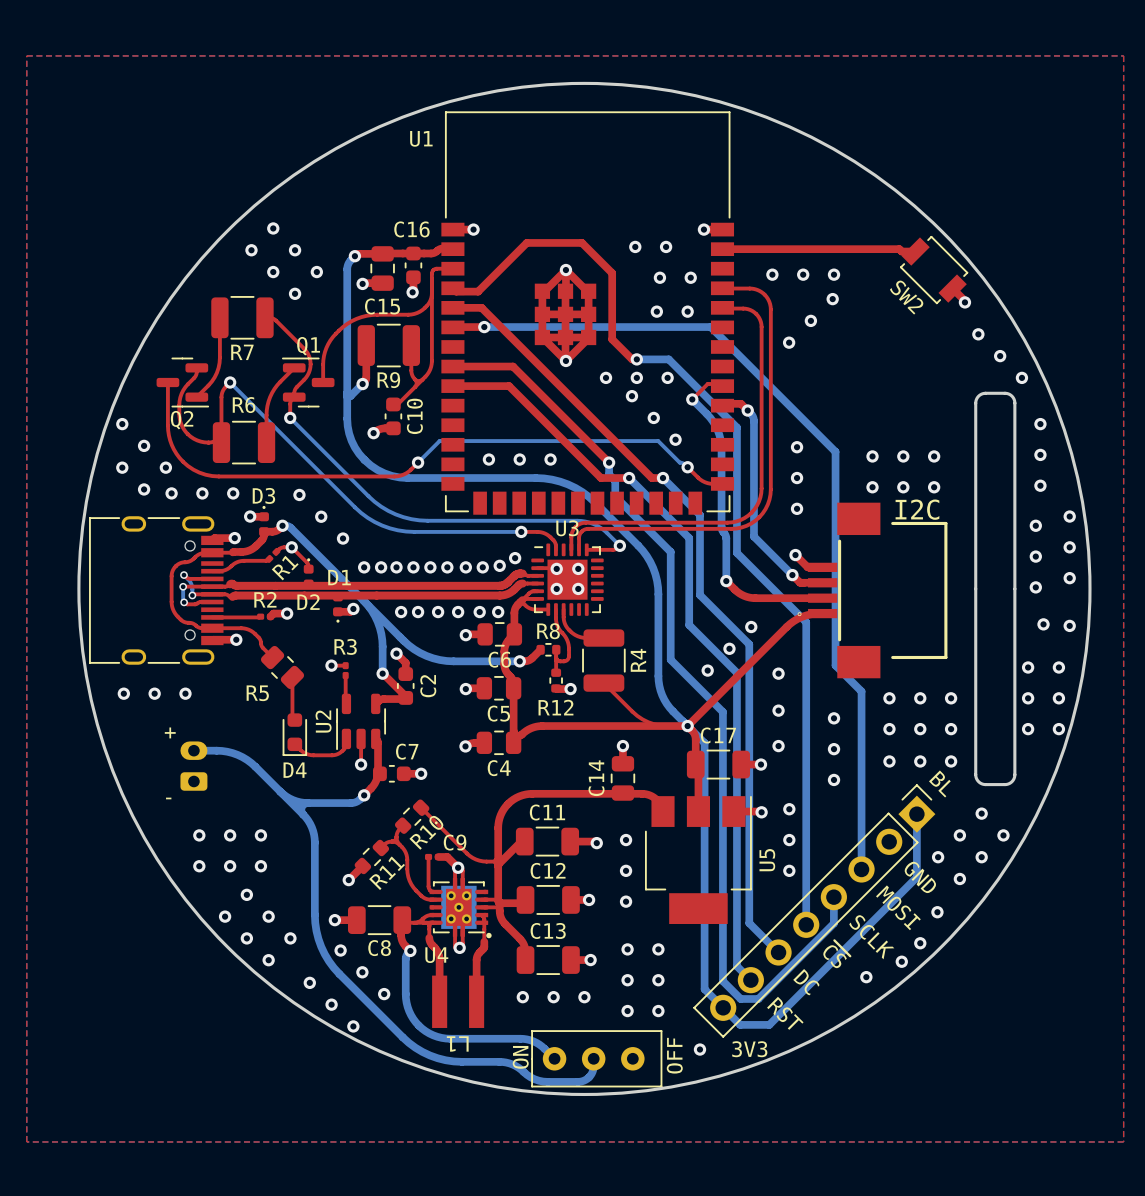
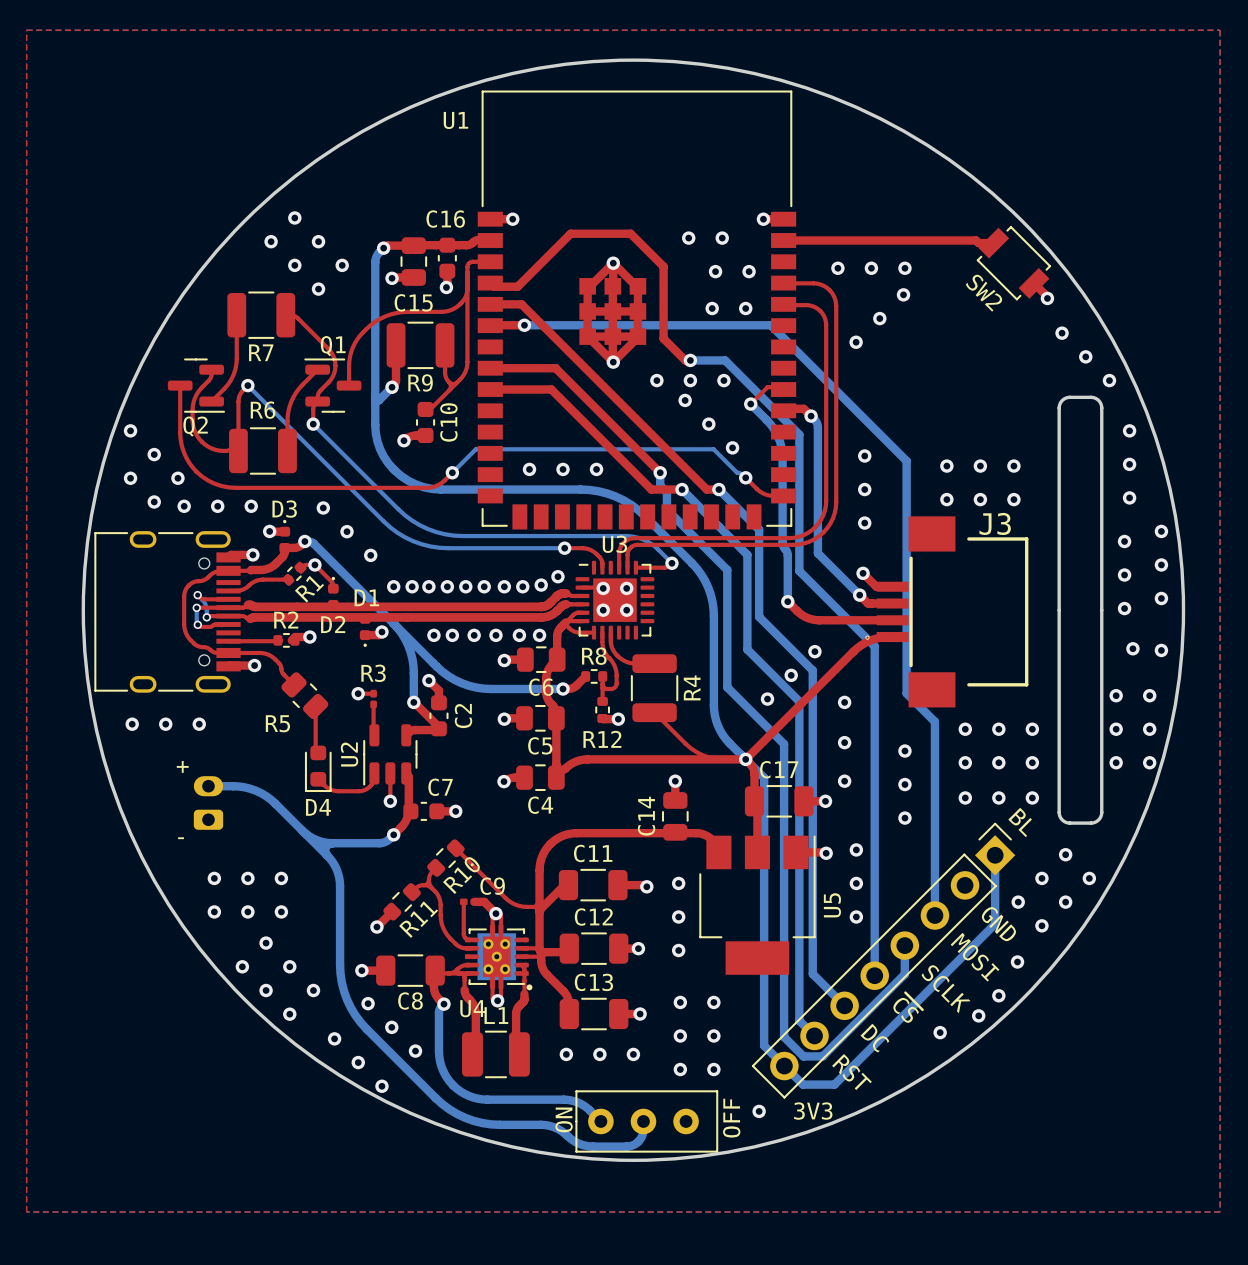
I2C name: I2C (917, 509) -> J3 (995, 523)
R1 footprint: [265, 547, 281, 563] -> [282, 561, 307, 586]
R2 footprint: [257, 613, 275, 620] -> [273, 633, 300, 648]
L1 footprint: [432, 975, 485, 1028] -> [462, 1030, 530, 1079]
L1 name position: L1 (457, 1043) -> L1 (496, 1015)

